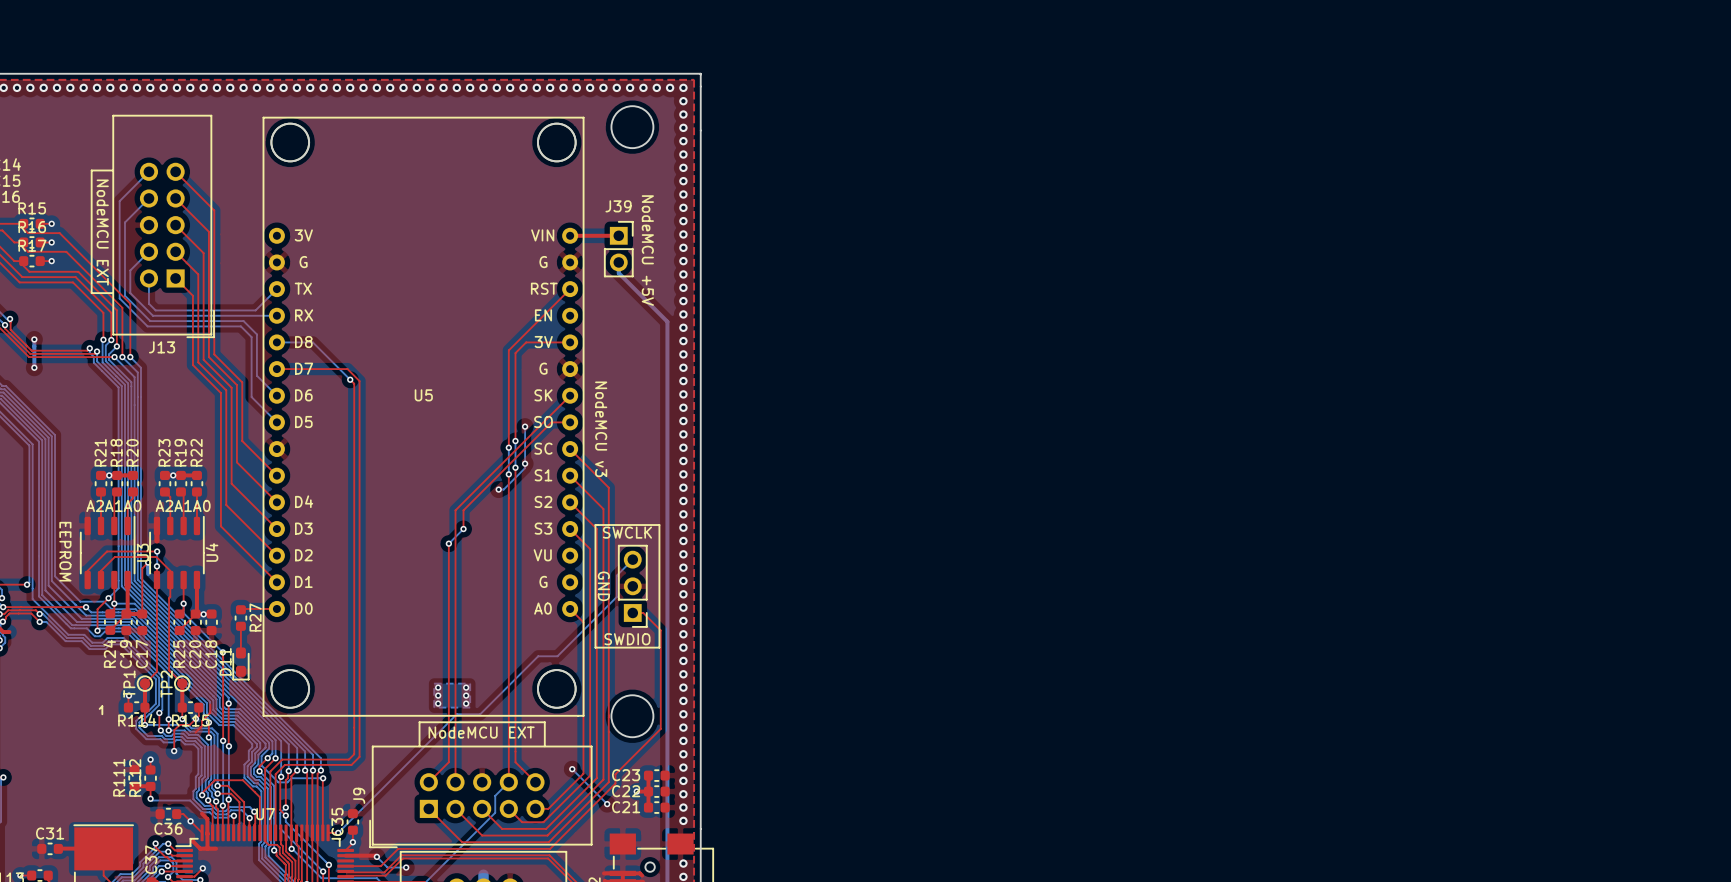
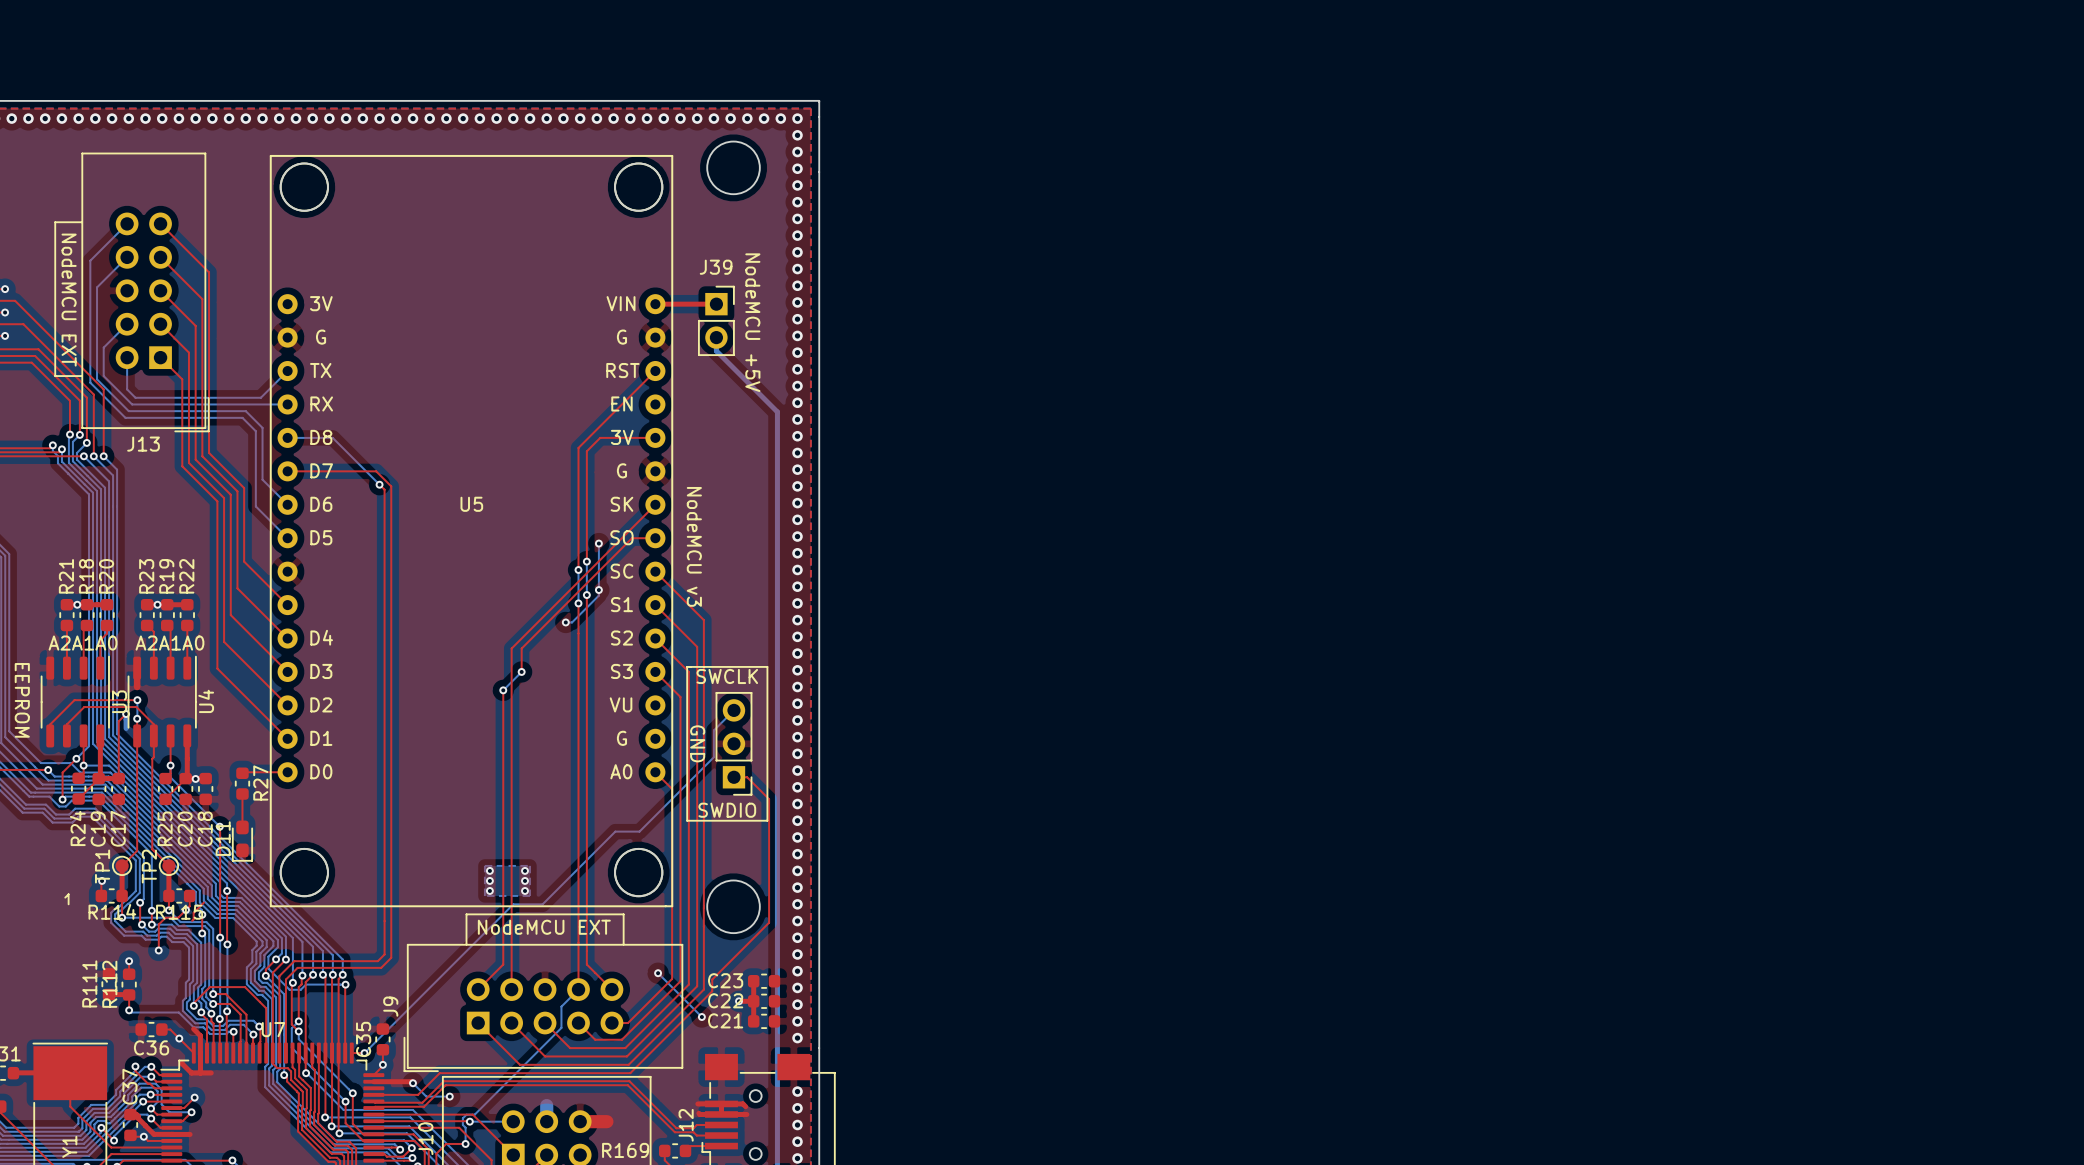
top track: (210, 704) (210, 712) -> none
top track: (200, 727) (195, 732) -> none

